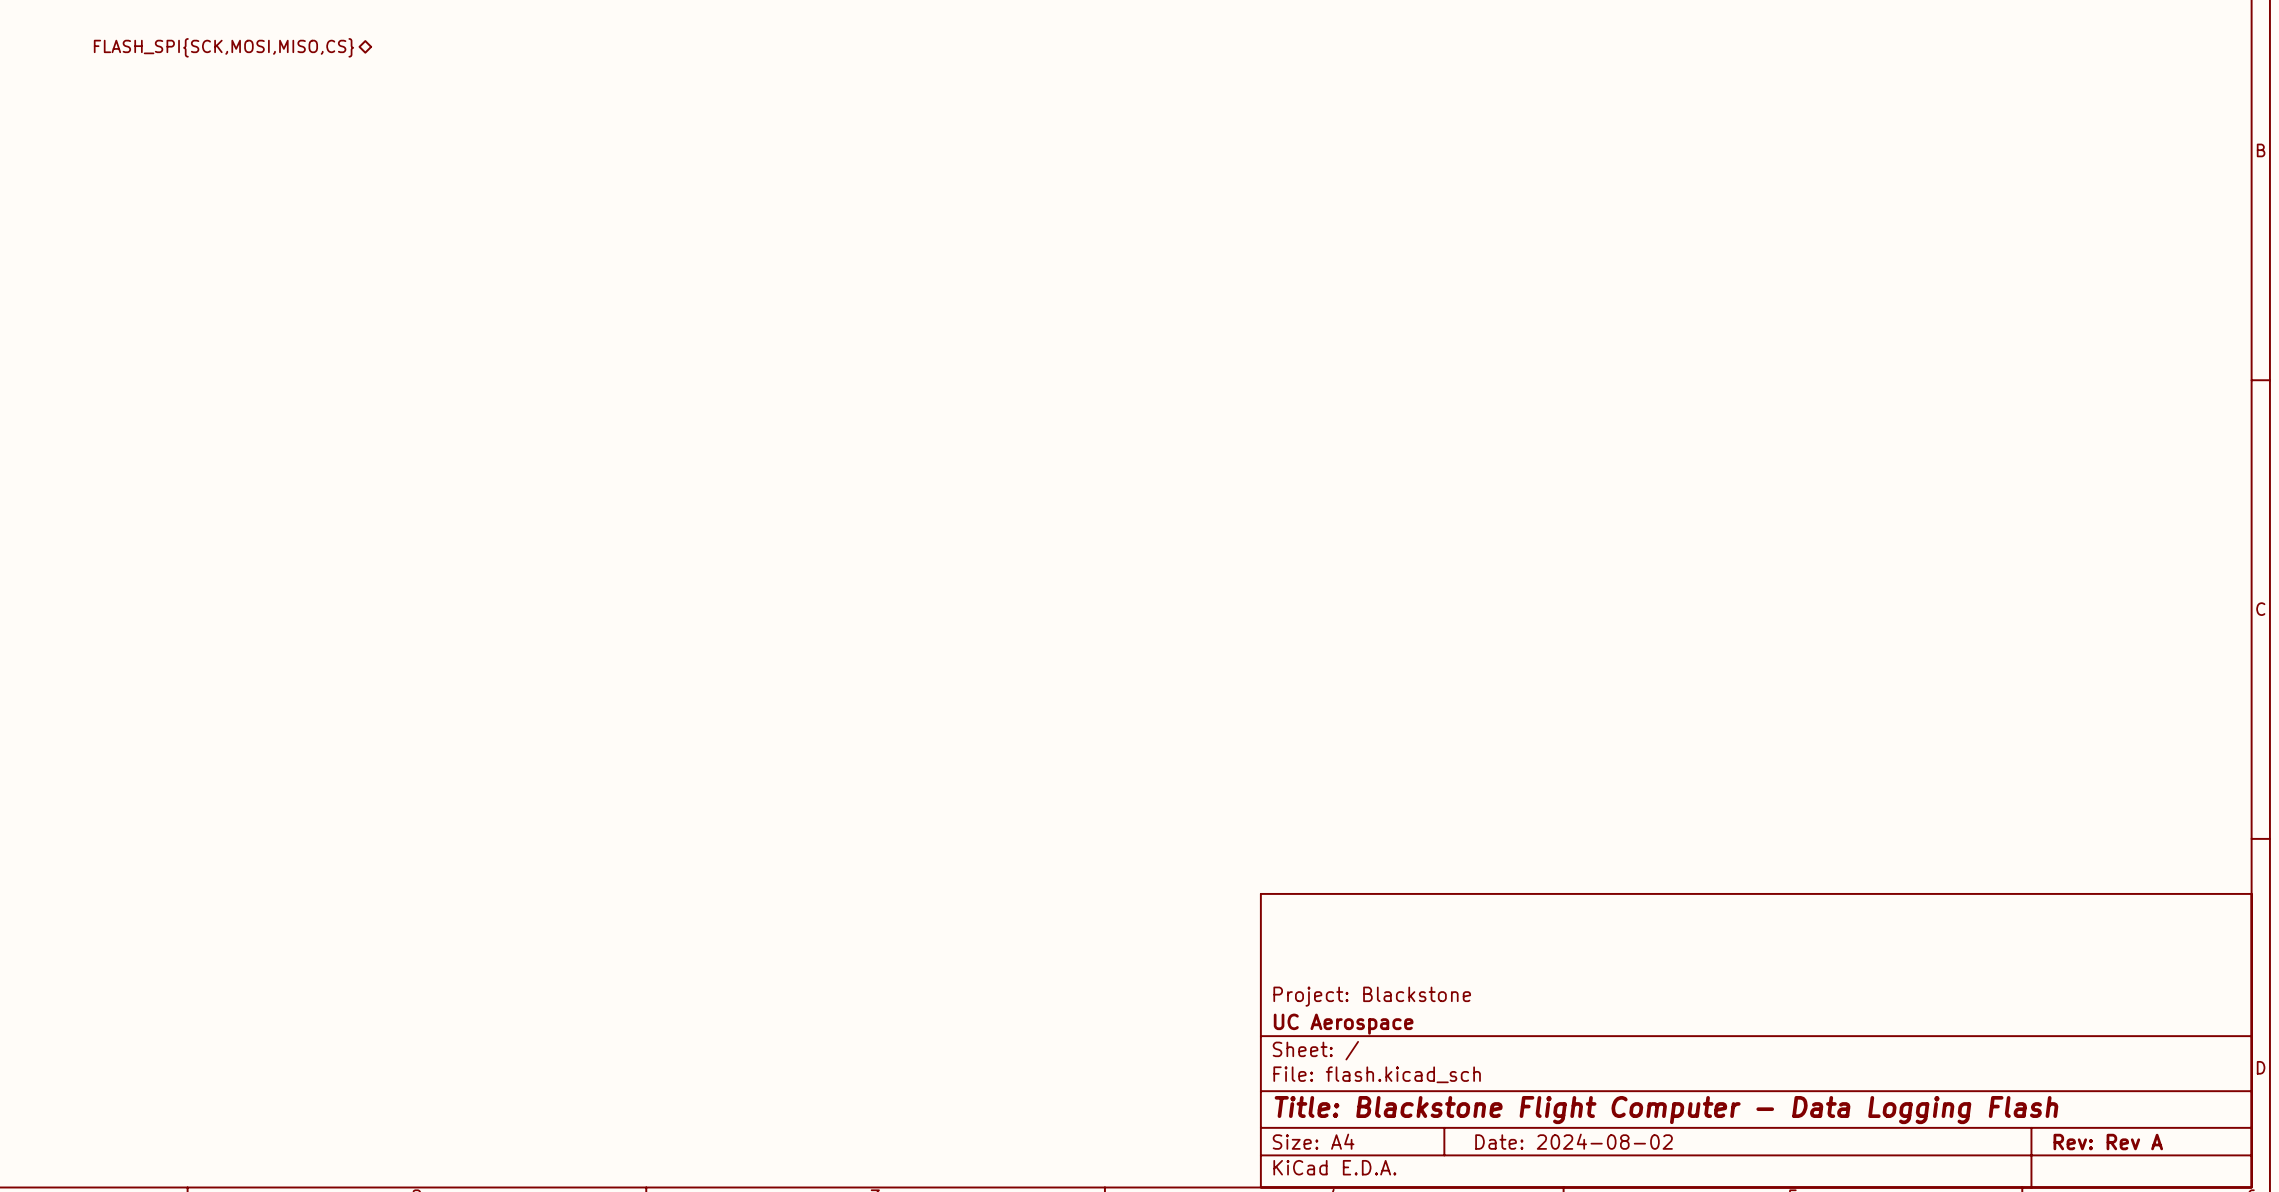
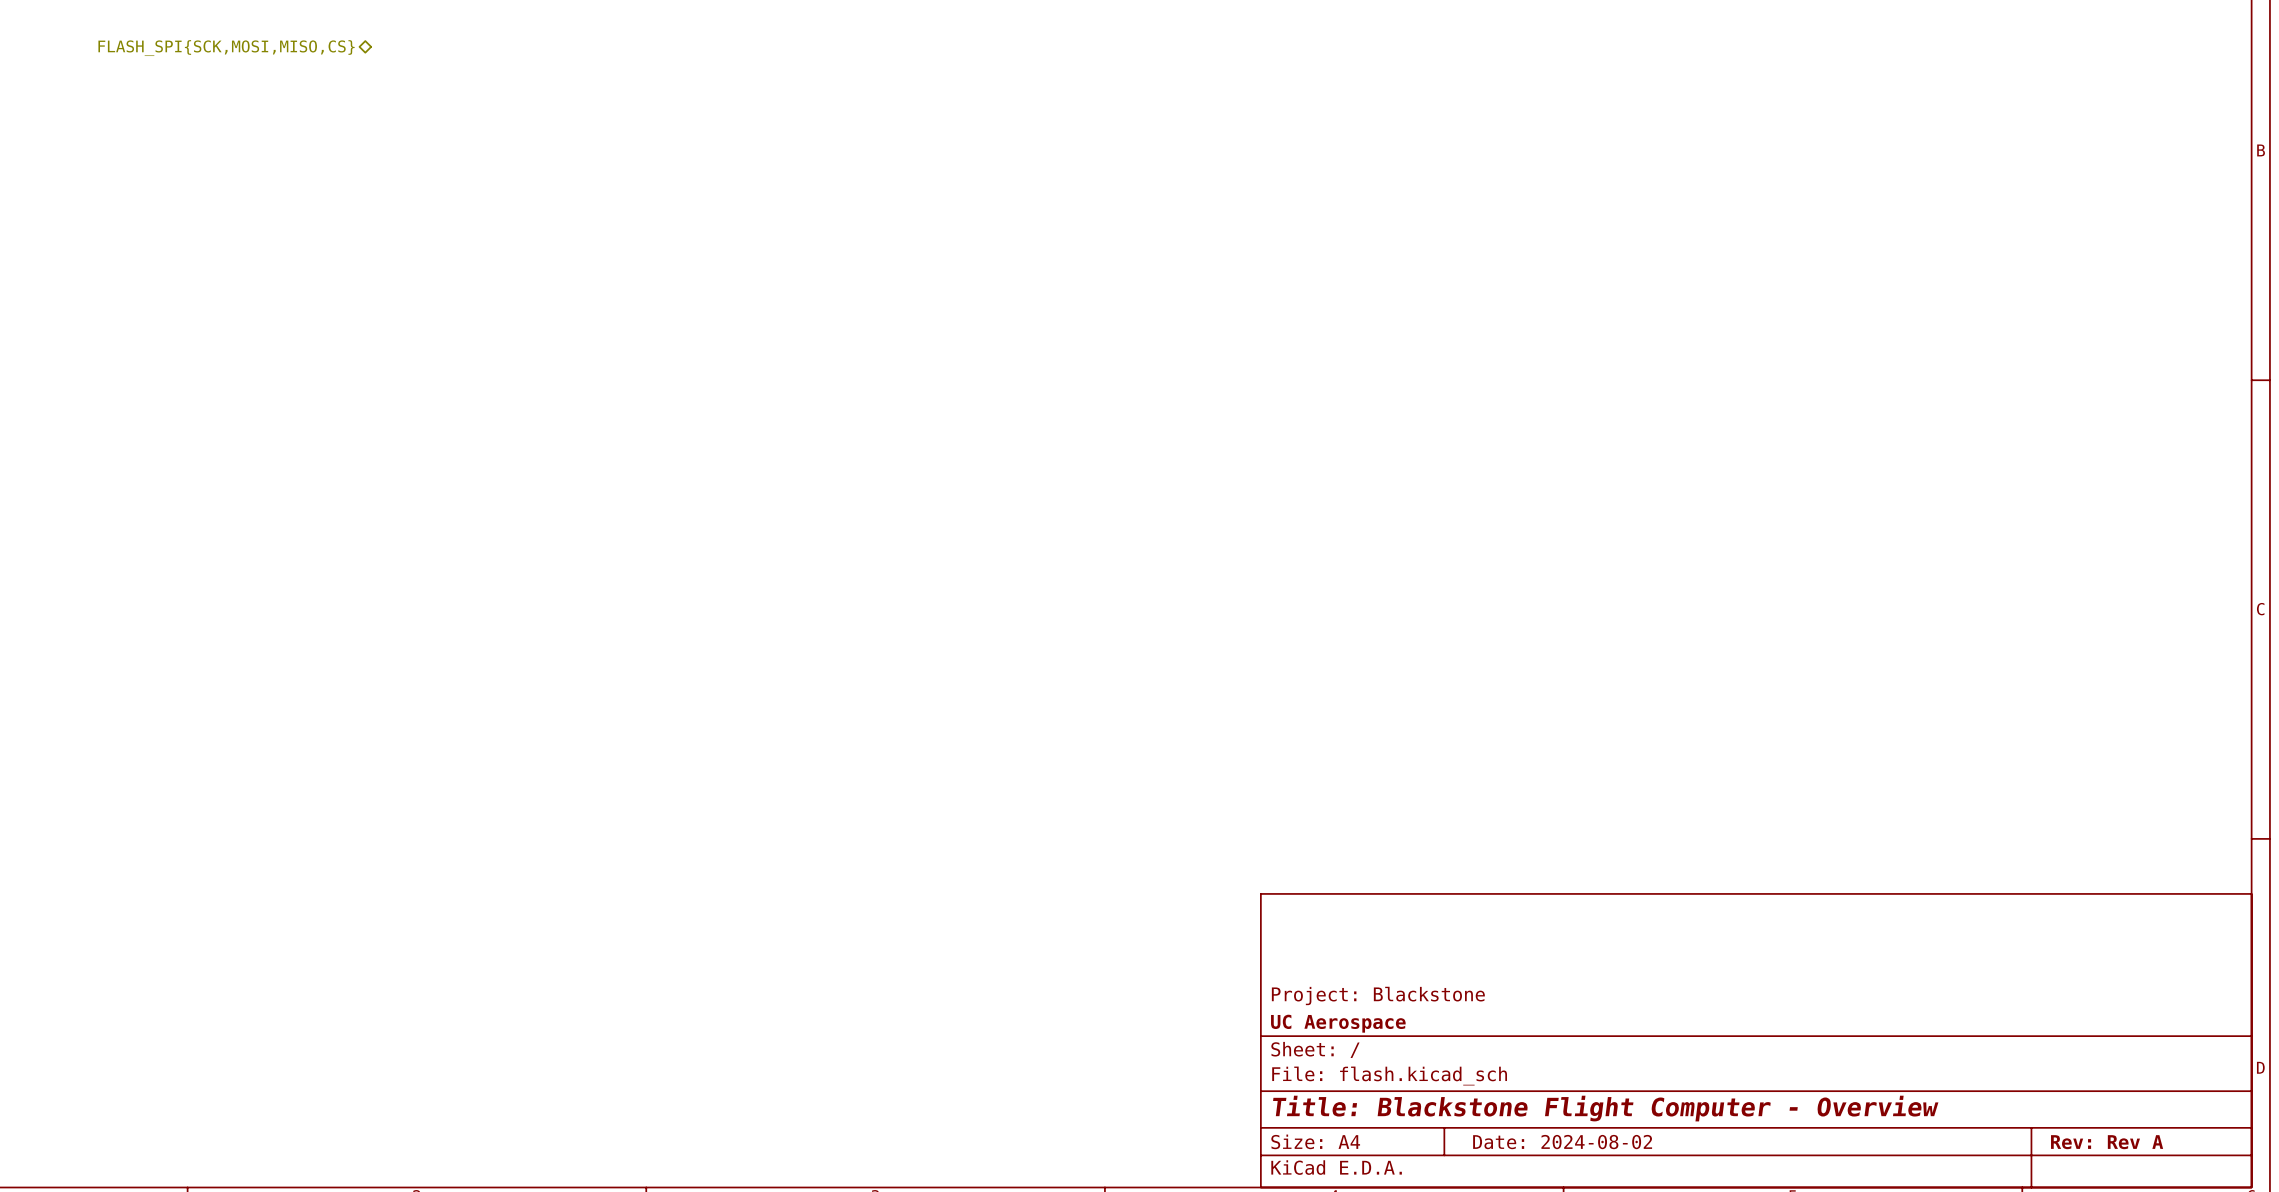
title block: Title: Blackstone Flight Computer - Data Logging Flash (1666, 1110) -> Title: Blackstone Flight Computer - Overview (1605, 1108)

